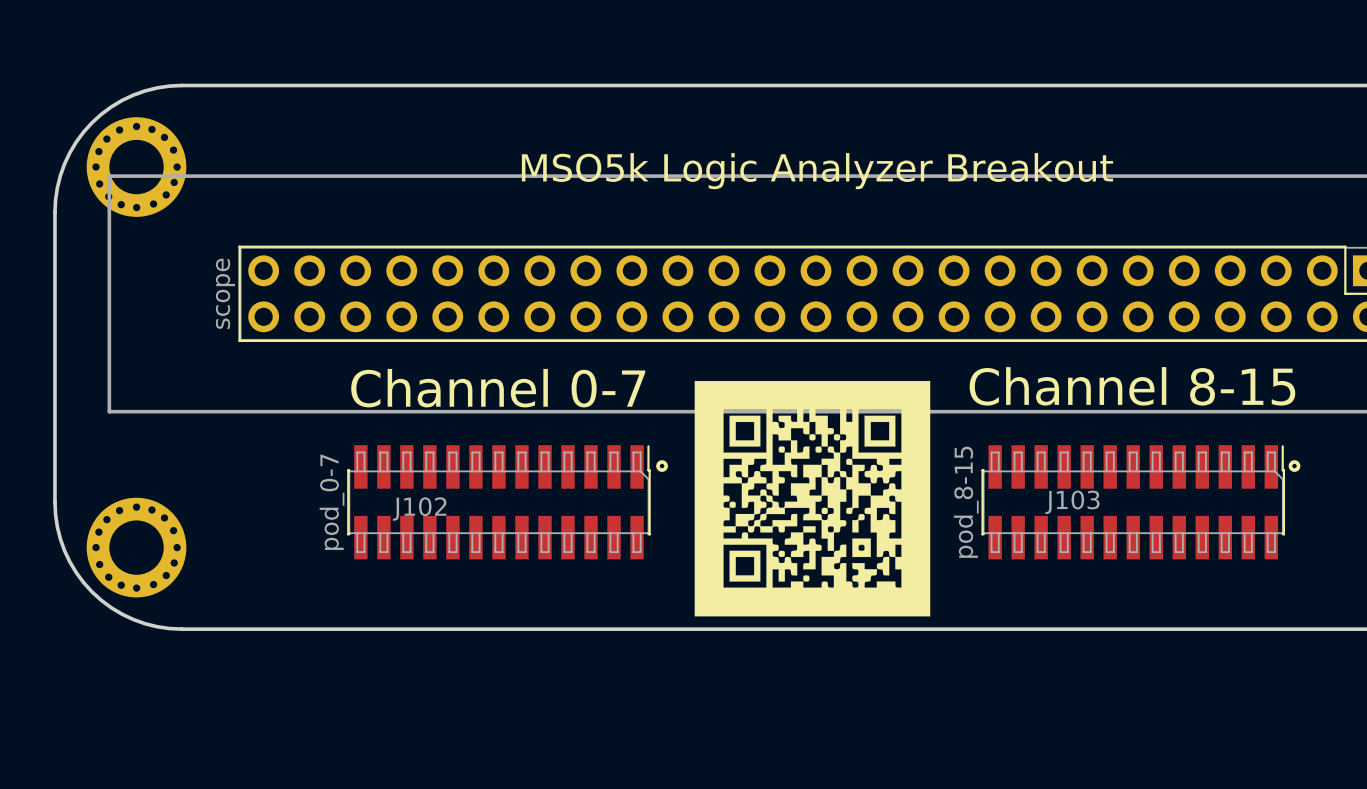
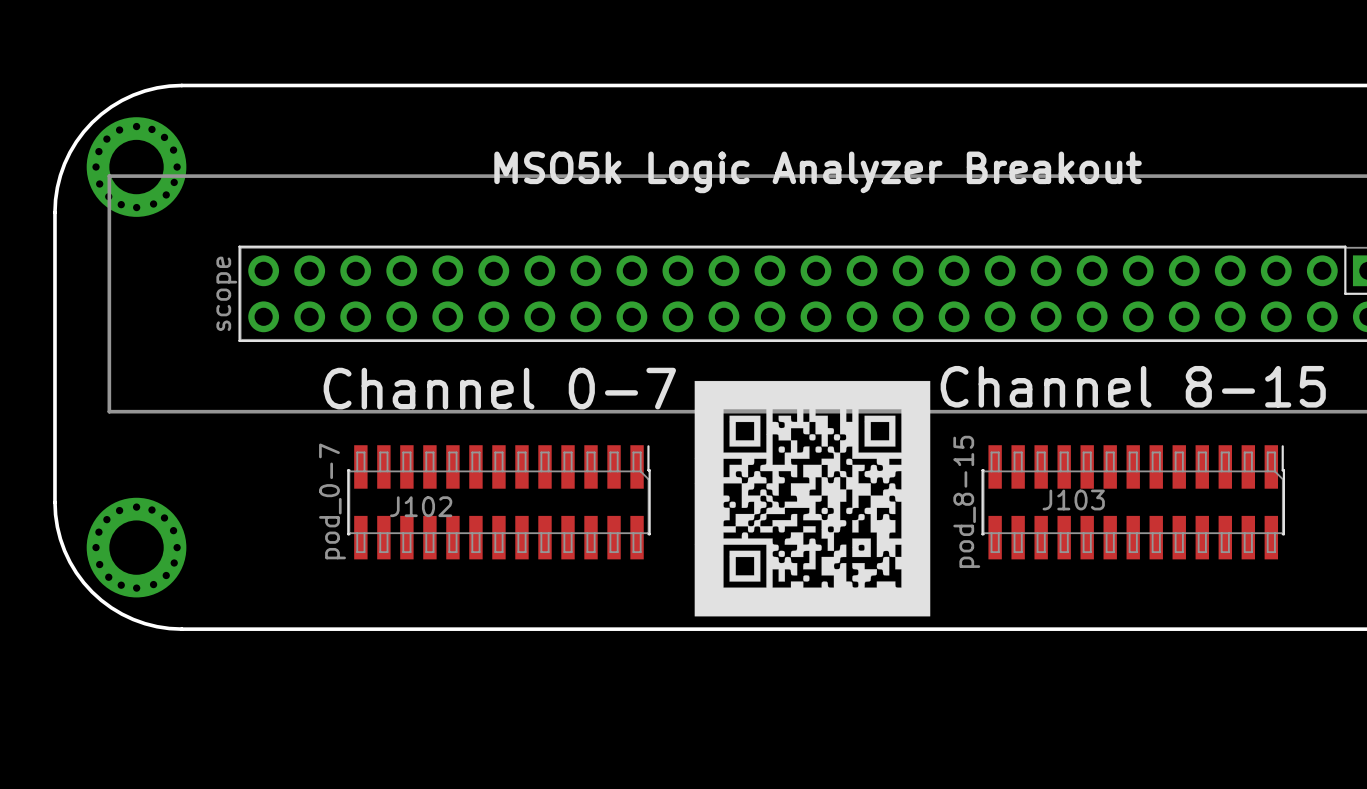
drawing: [656, 460, 668, 472] -> none
drawing: [1288, 460, 1301, 472] -> none

